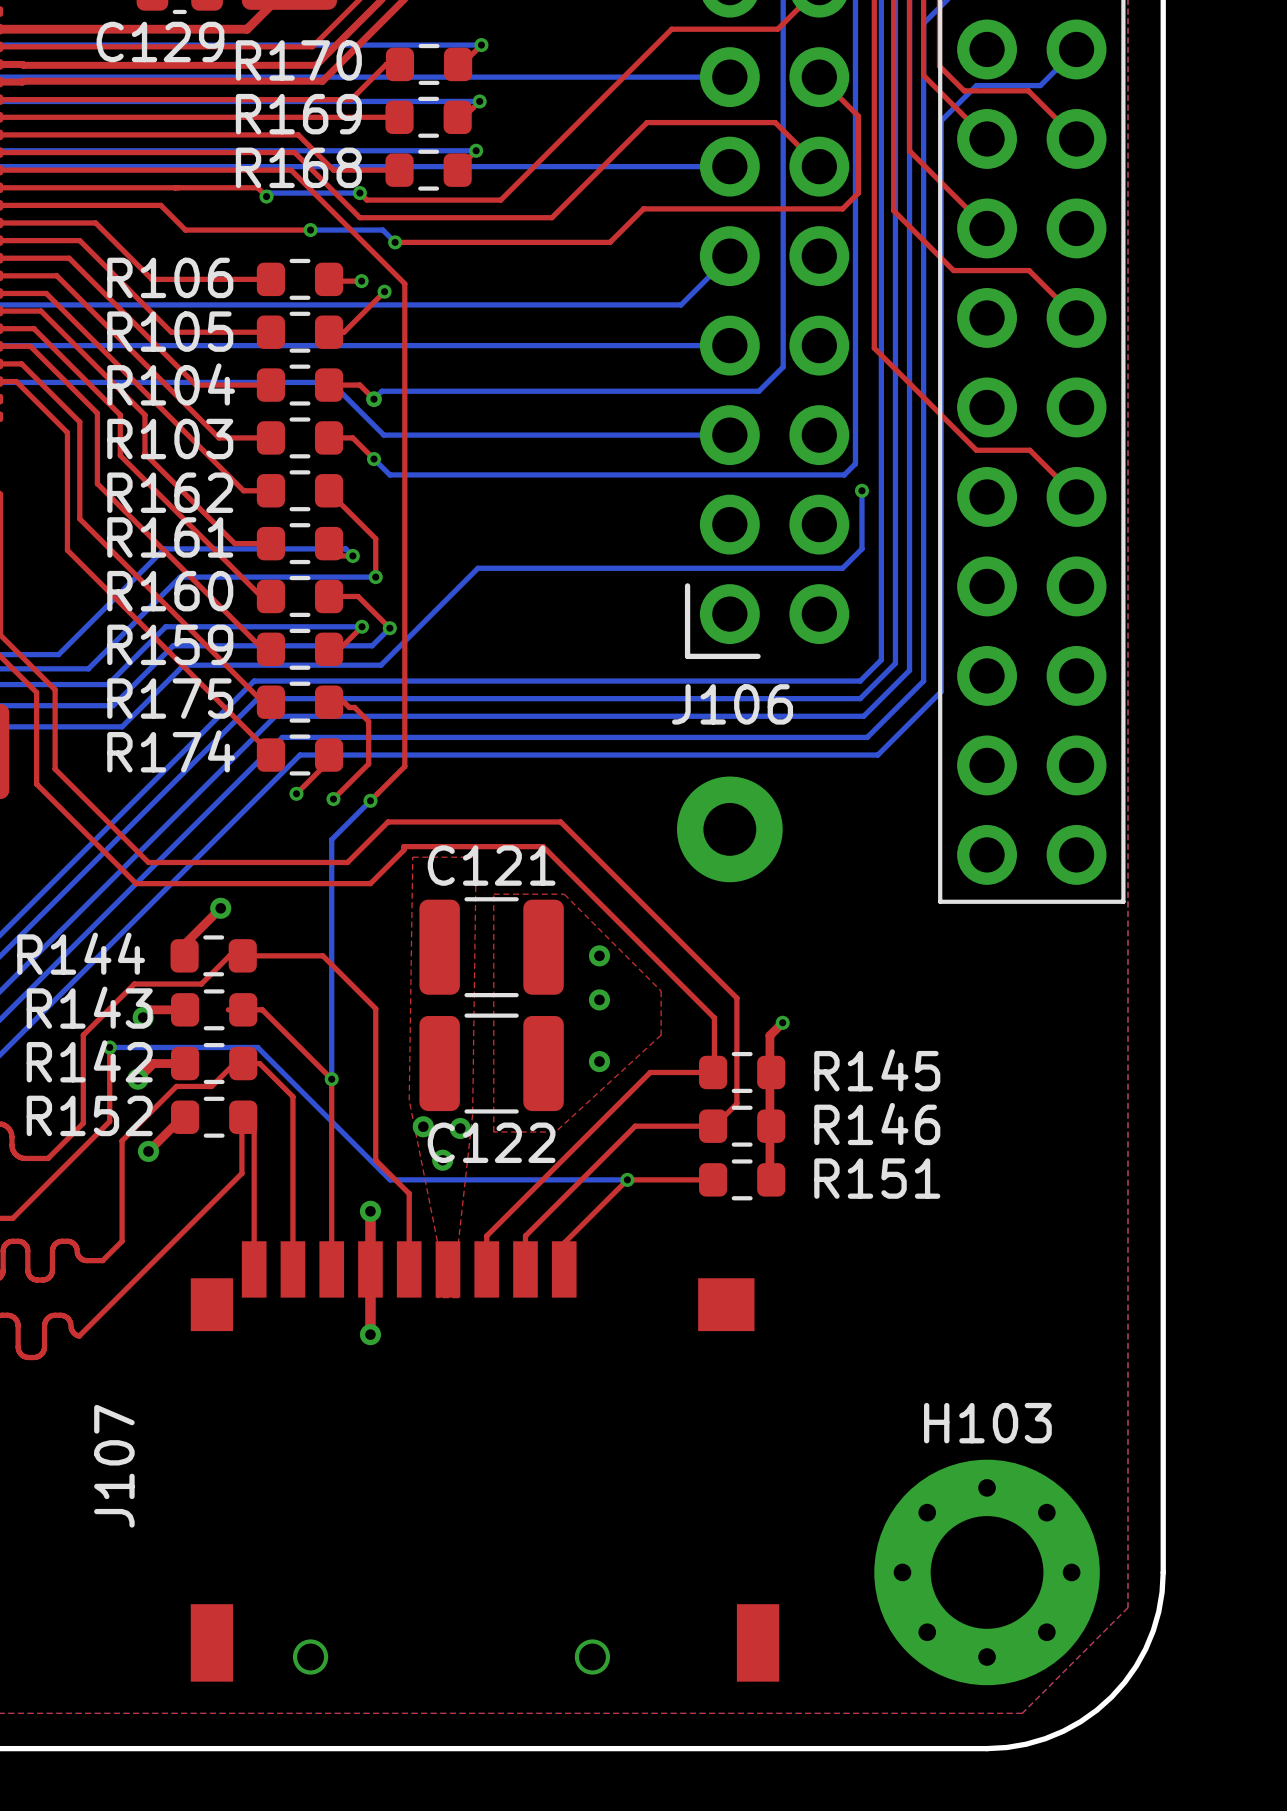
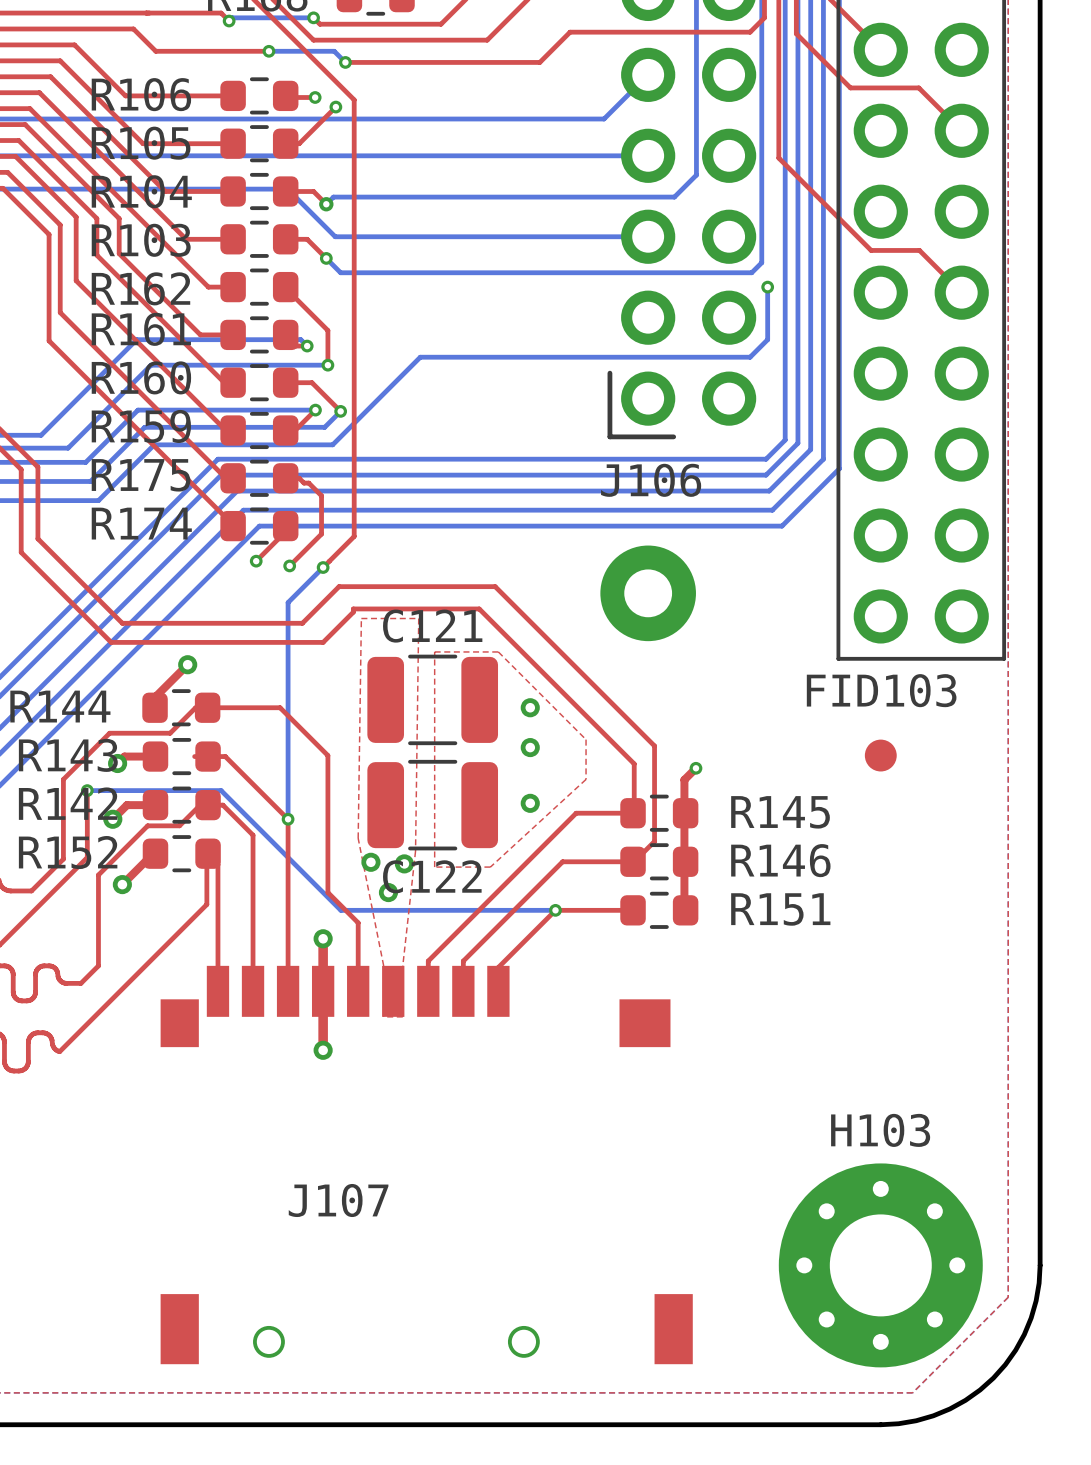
FID103: none -> (880, 755)
J107 name rotation: 0° (114, 1466) -> 90° clockwise (338, 1200)
J107 name position: J107 (114, 1466) -> J107 (338, 1200)

